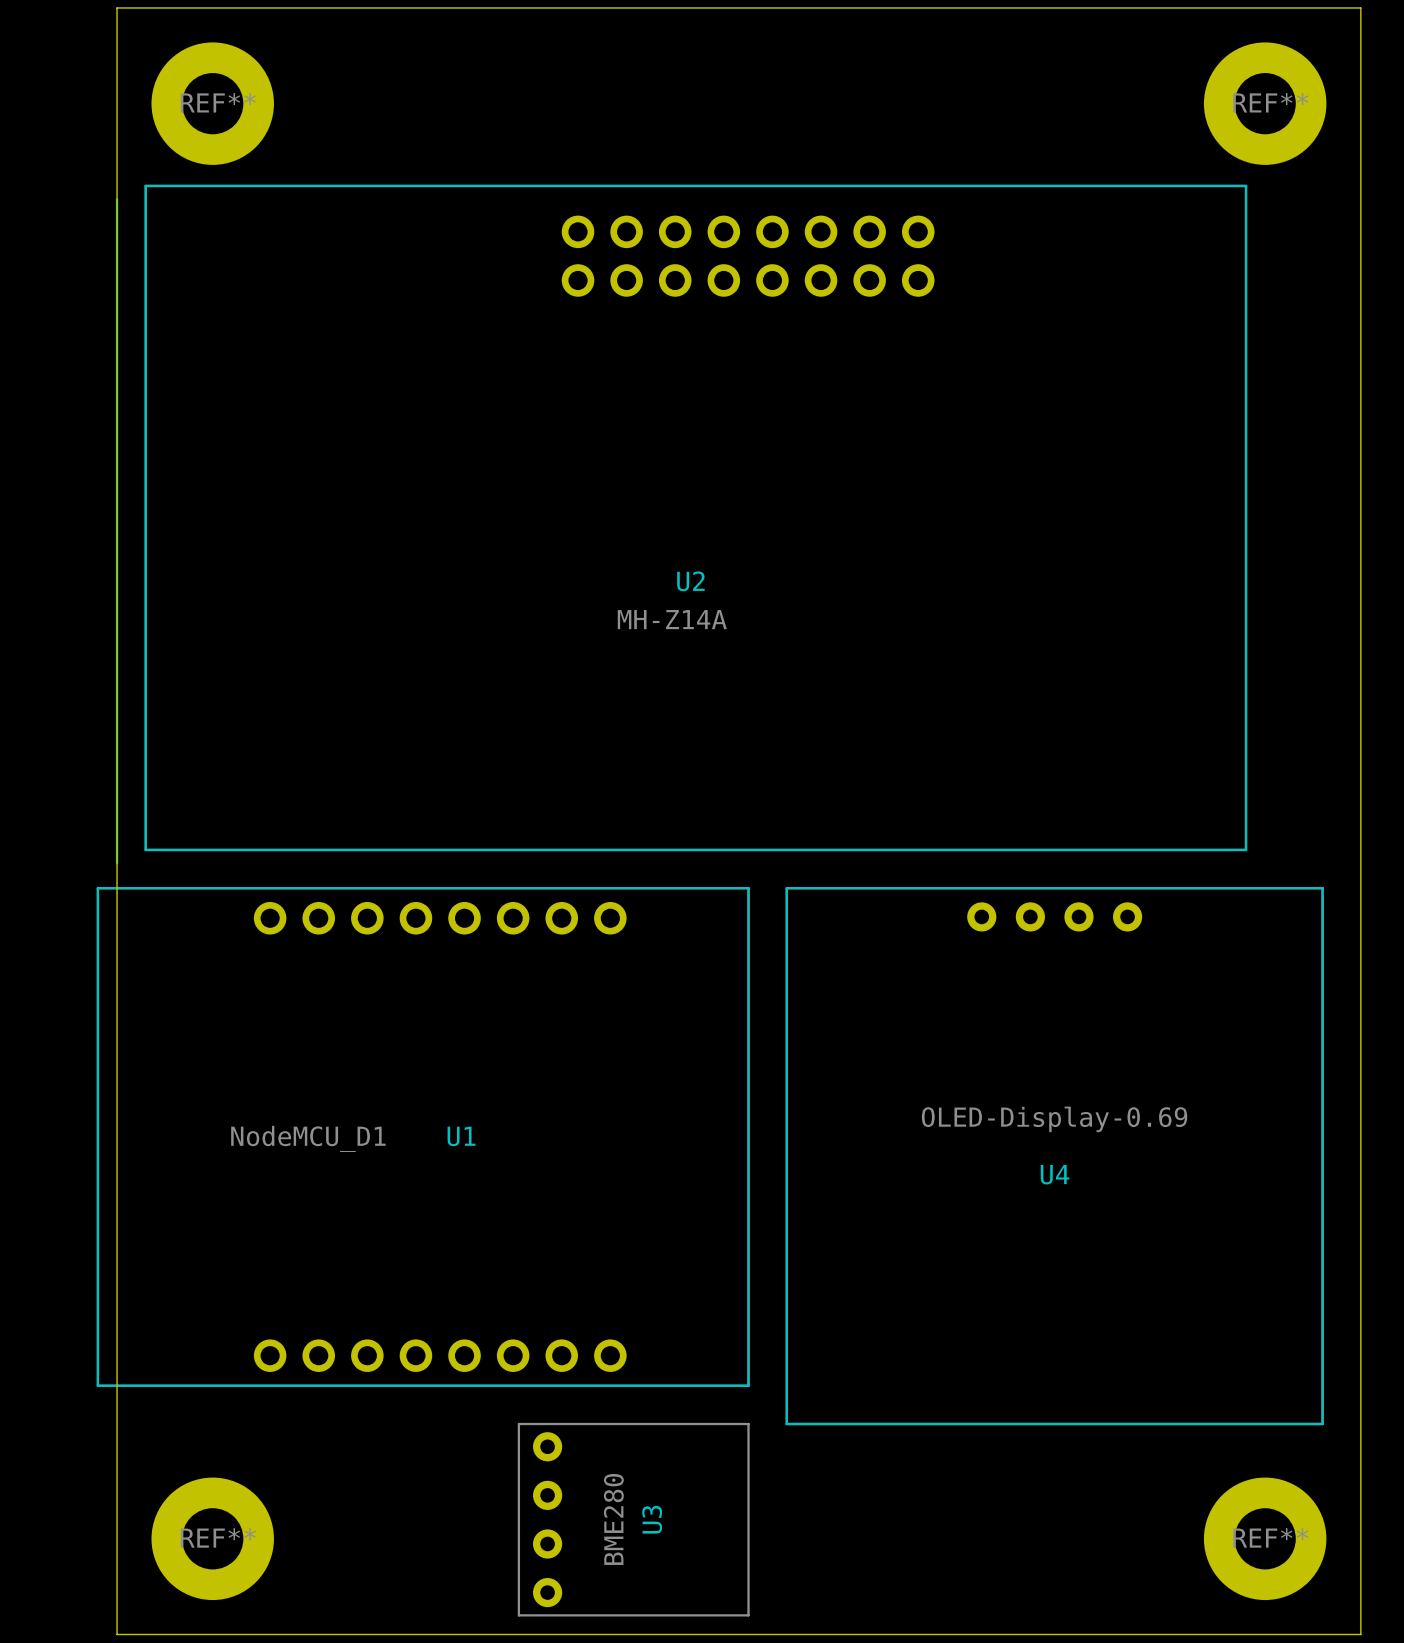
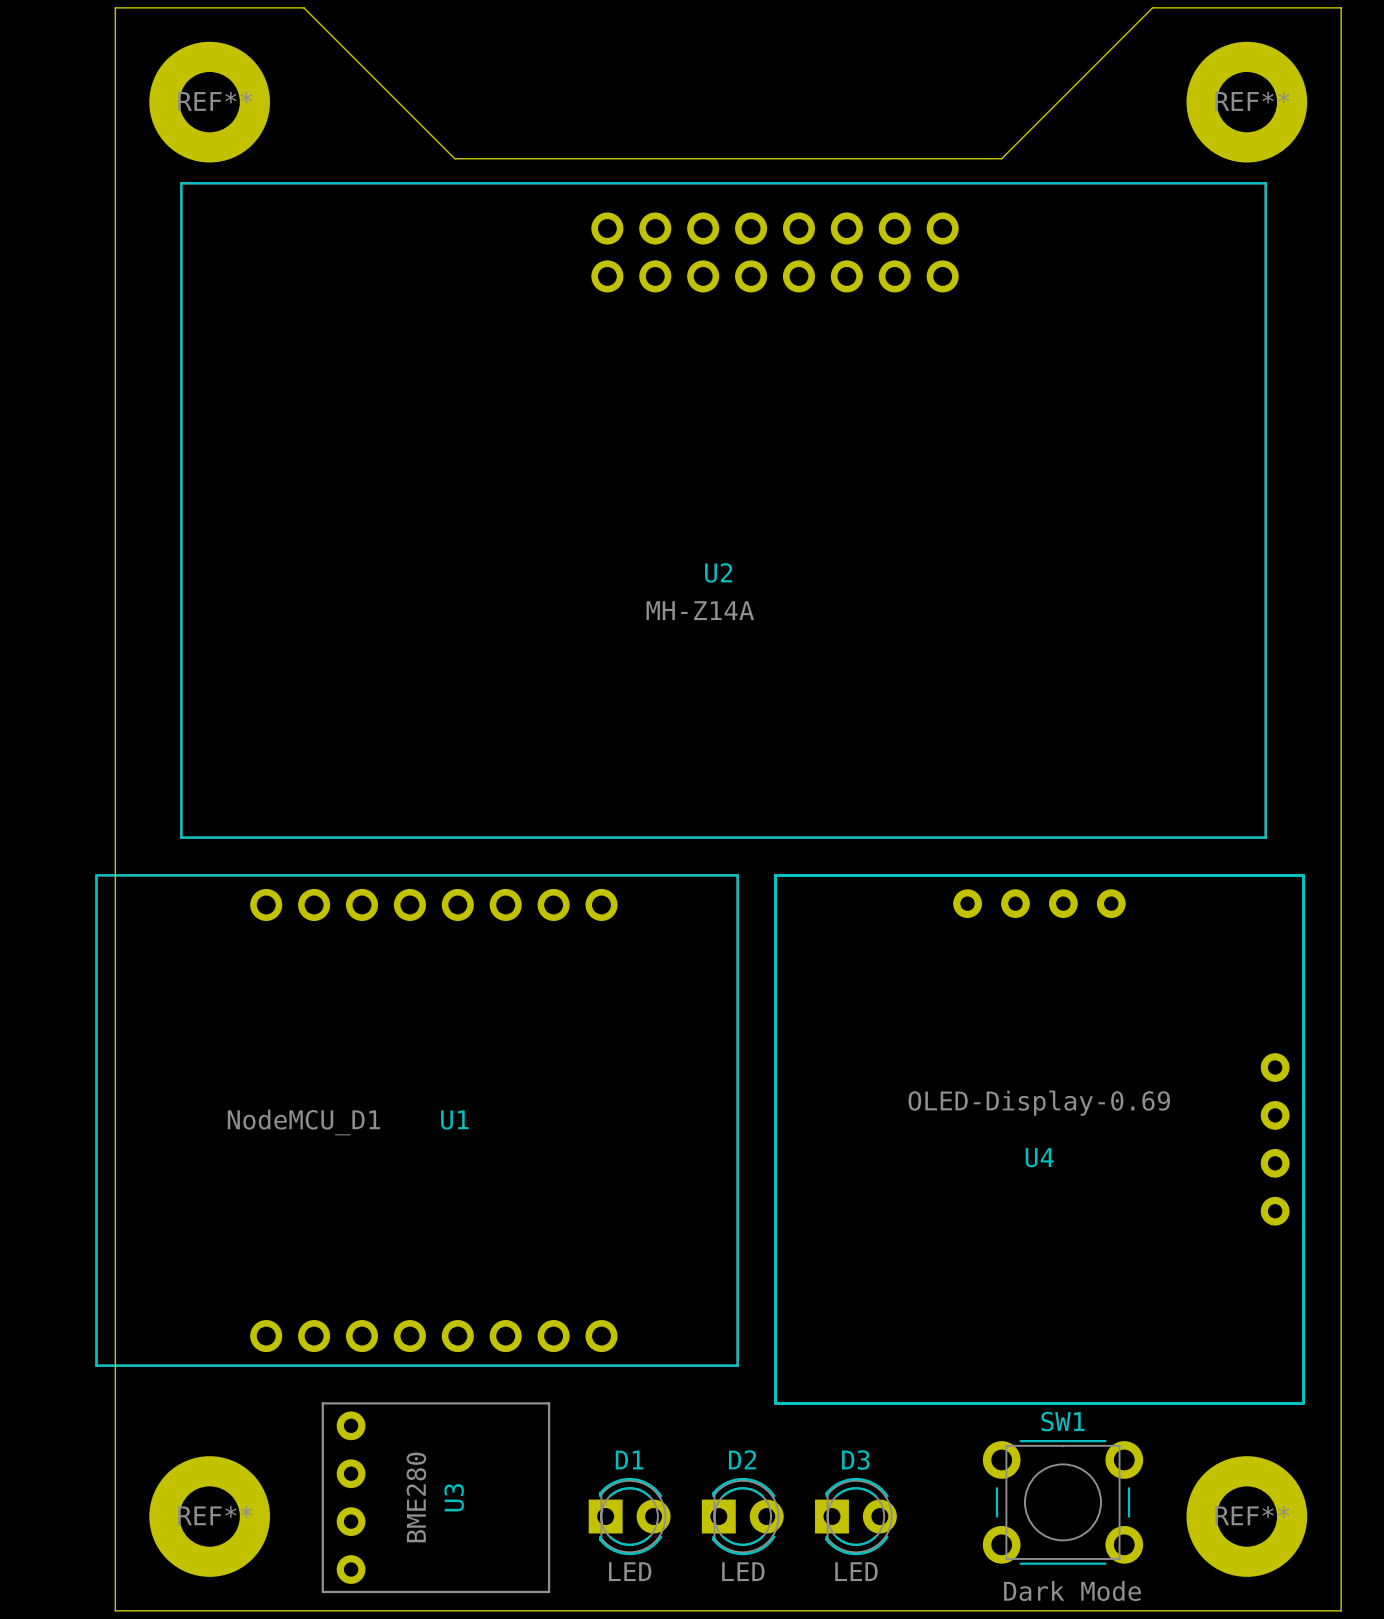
board edge: (308, 7) (1169, 7) -> (303, 7) (454, 158) (1001, 158) (1152, 7)
line: (117, 199) (117, 863) -> none
U2 position: (695, 517) -> (723, 510)
part: none -> (1039, 1139)
U3 position: (633, 1519) -> (435, 1497)
SW1: none -> Dark Mode (1062, 1502)
D1: none -> LED (629, 1516)
D2: none -> LED (742, 1516)
D3: none -> LED (855, 1516)

